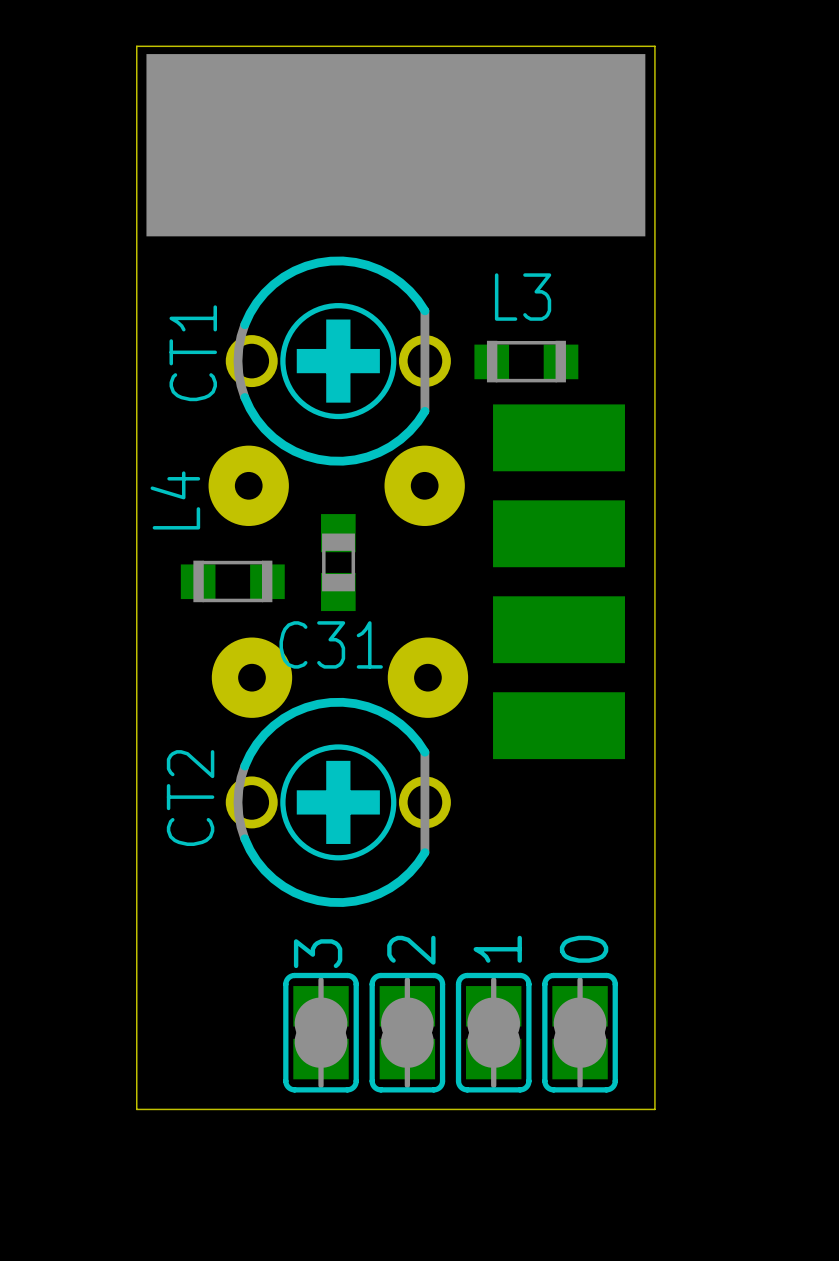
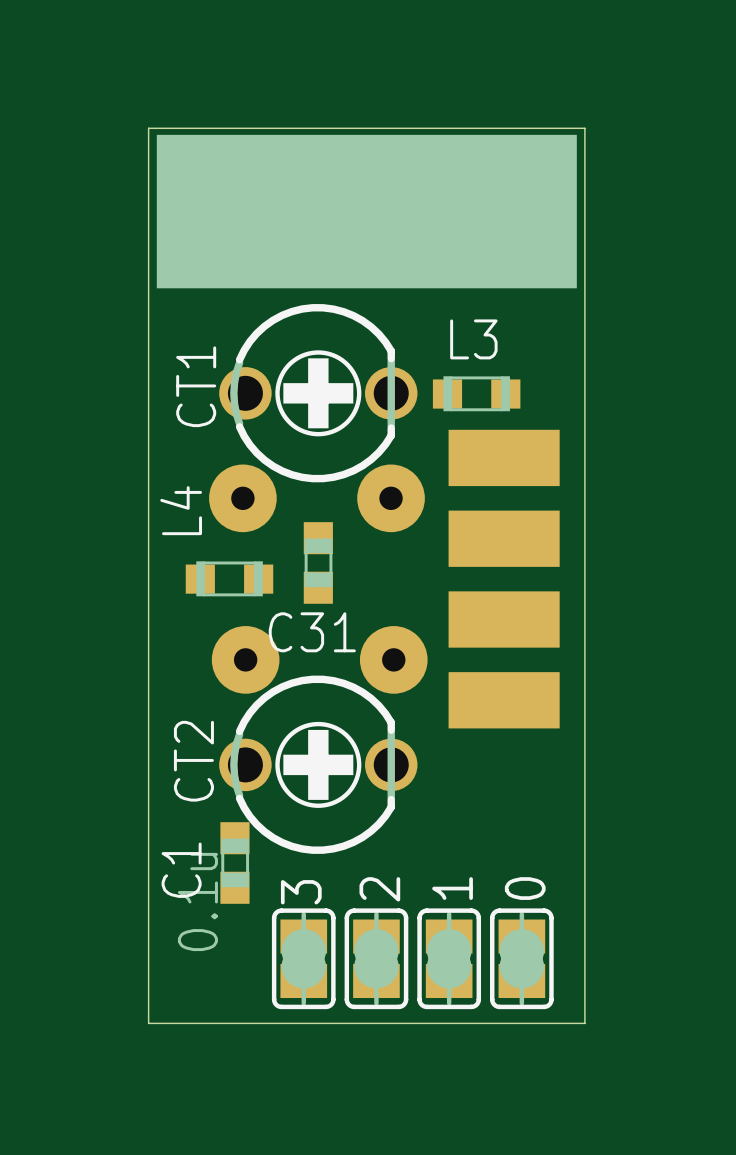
CT1 footprint: [225, 256, 451, 466] -> [219, 304, 418, 483]
CT2 footprint: [225, 697, 451, 907] -> [219, 675, 418, 854]
C1: none -> 0.1u (234, 863)

